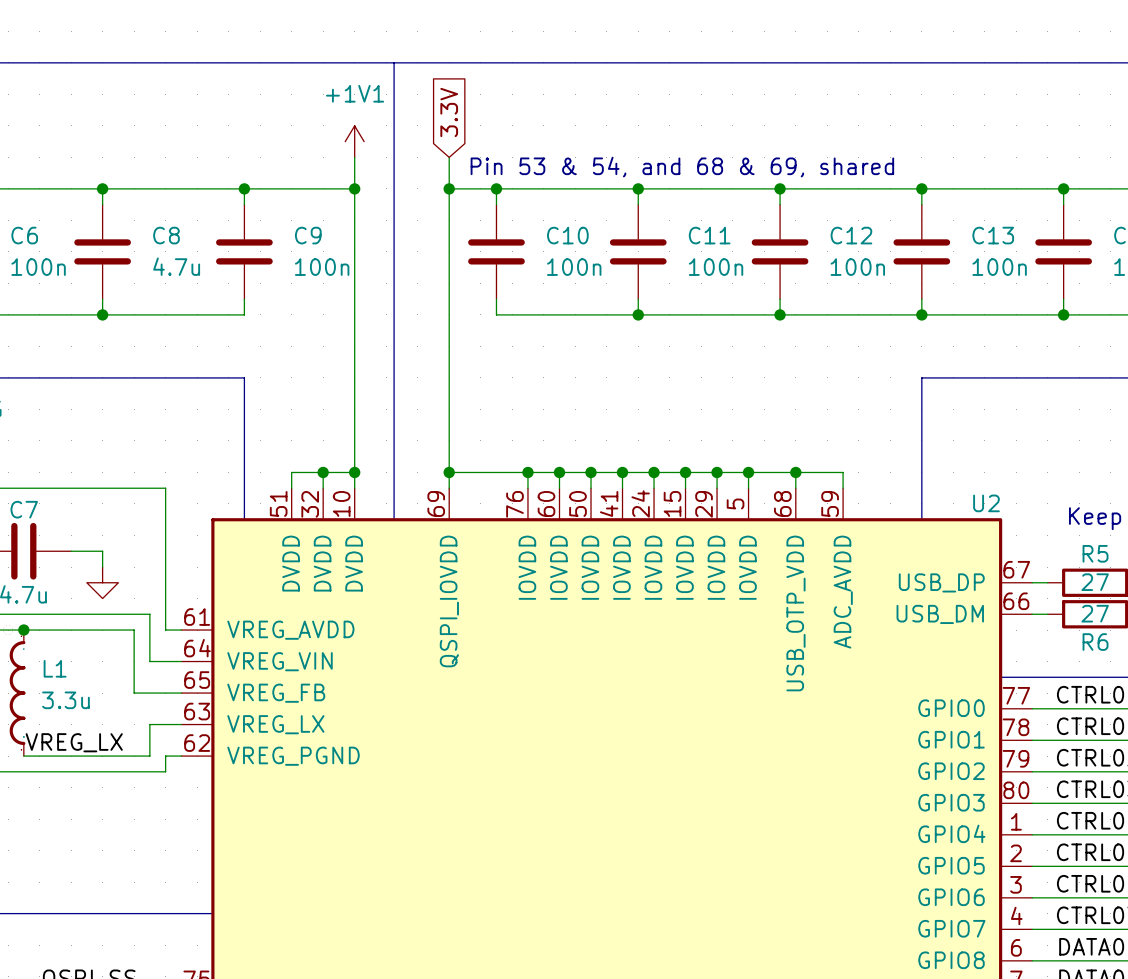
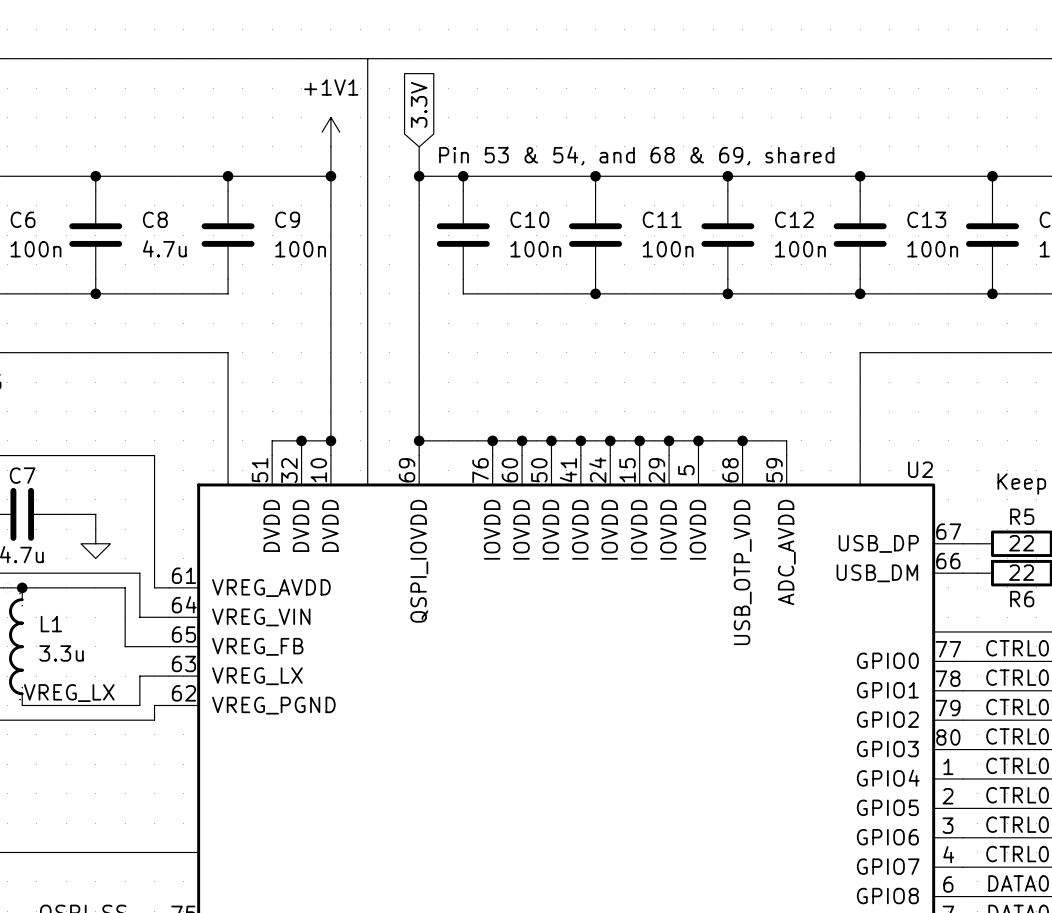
R5 value: 27 (1095, 582) -> 22 (1021, 543)
R6 value: 27 (1095, 613) -> 22 (1021, 572)

